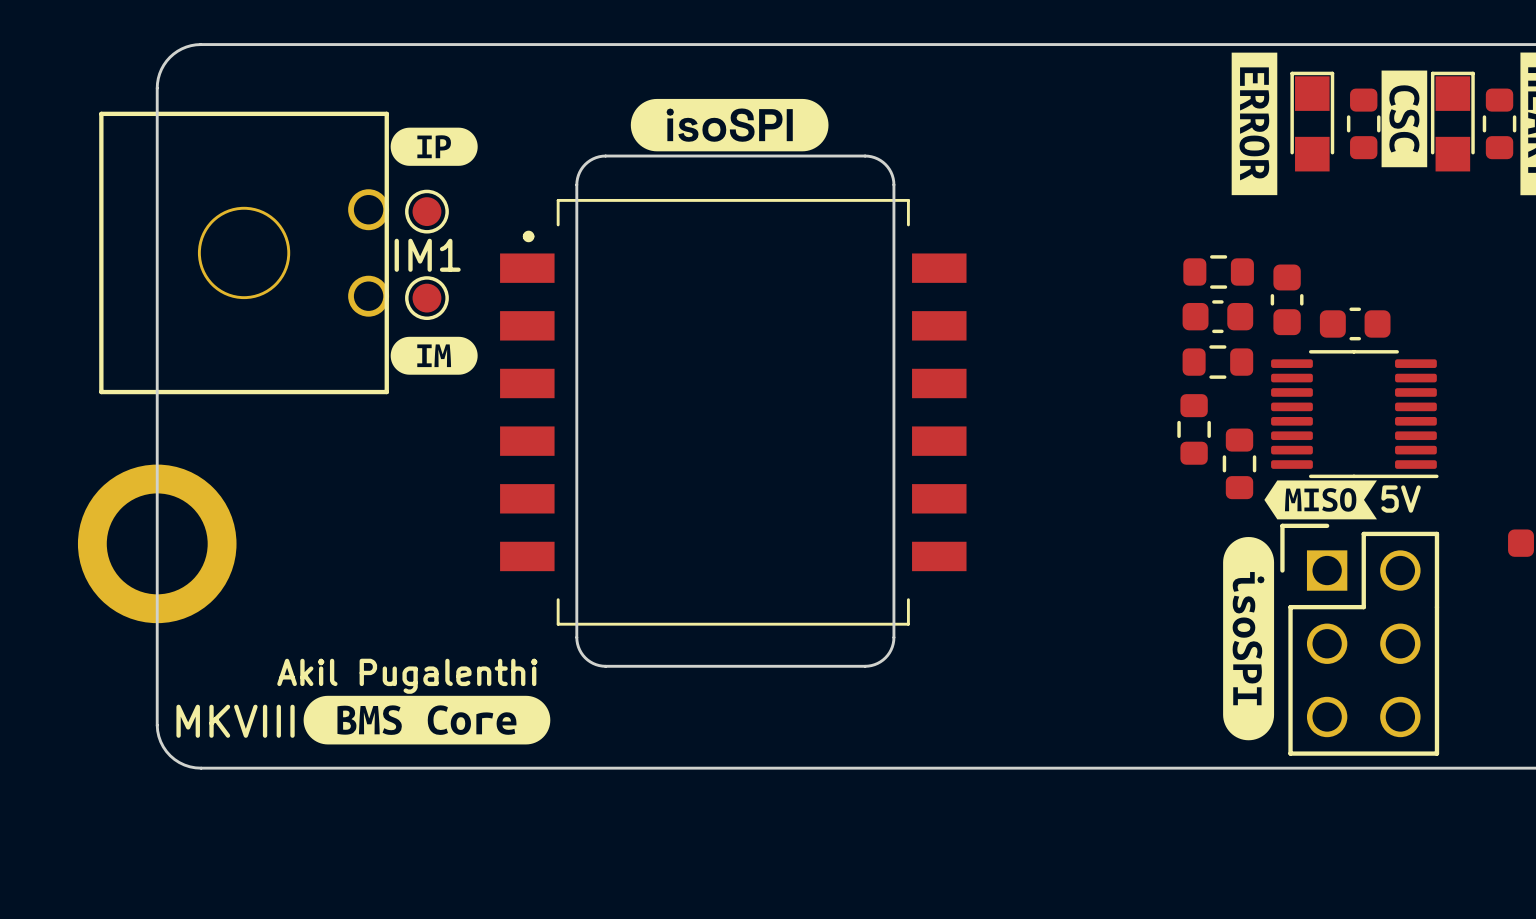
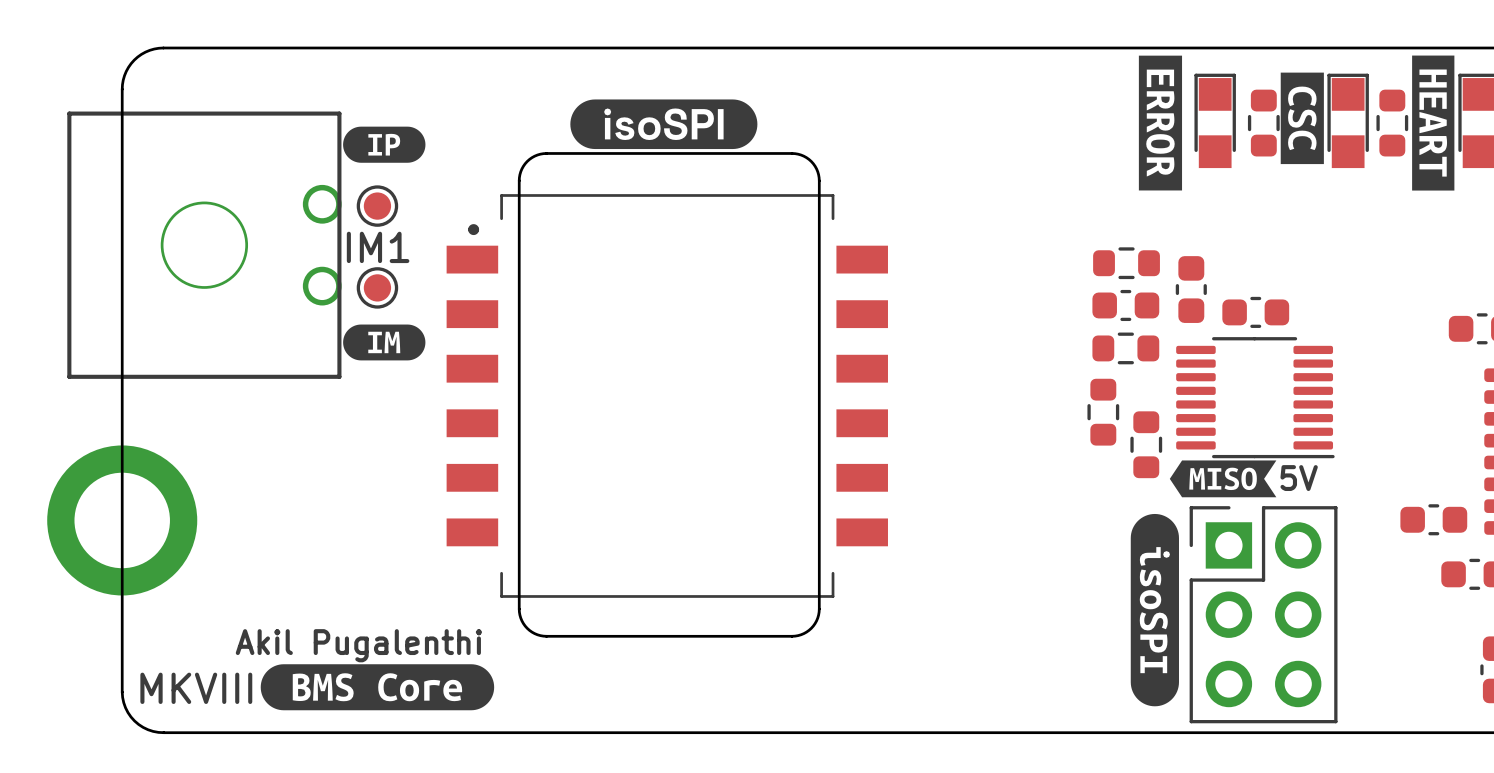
part footprint: [1280, 523, 1440, 756] -> [1189, 506, 1338, 724]

